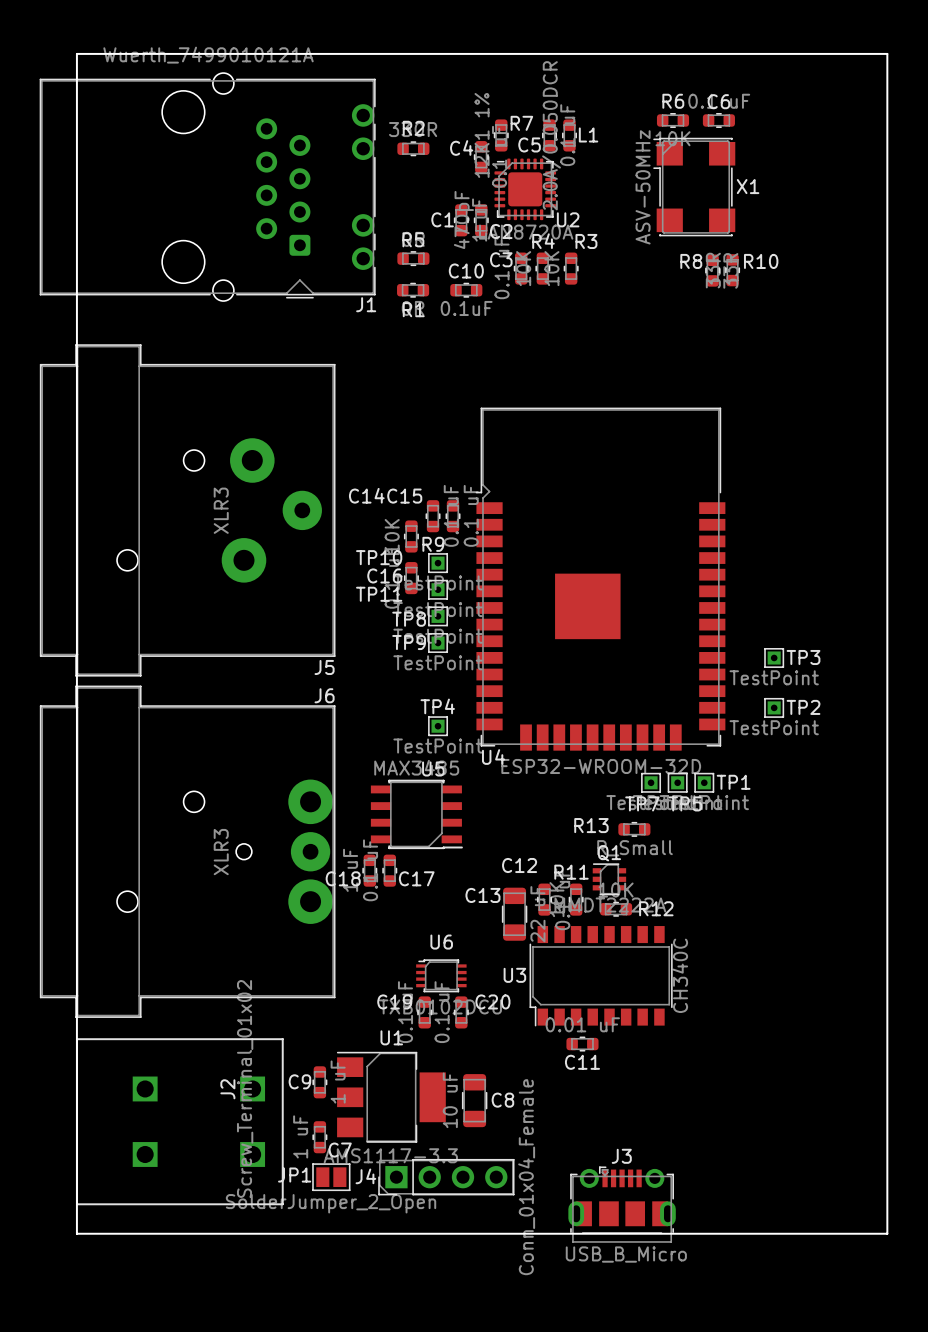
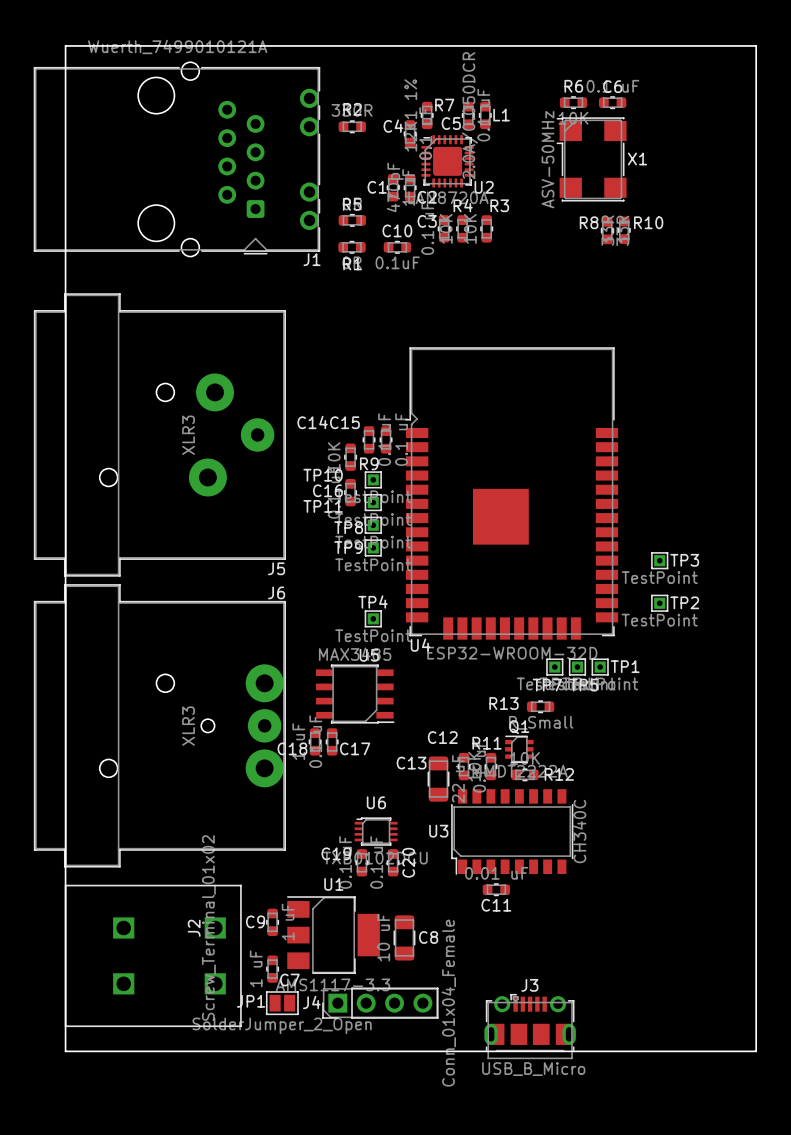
C20 name rotation: 0° (492, 1001) -> 90° counterclockwise (408, 862)

